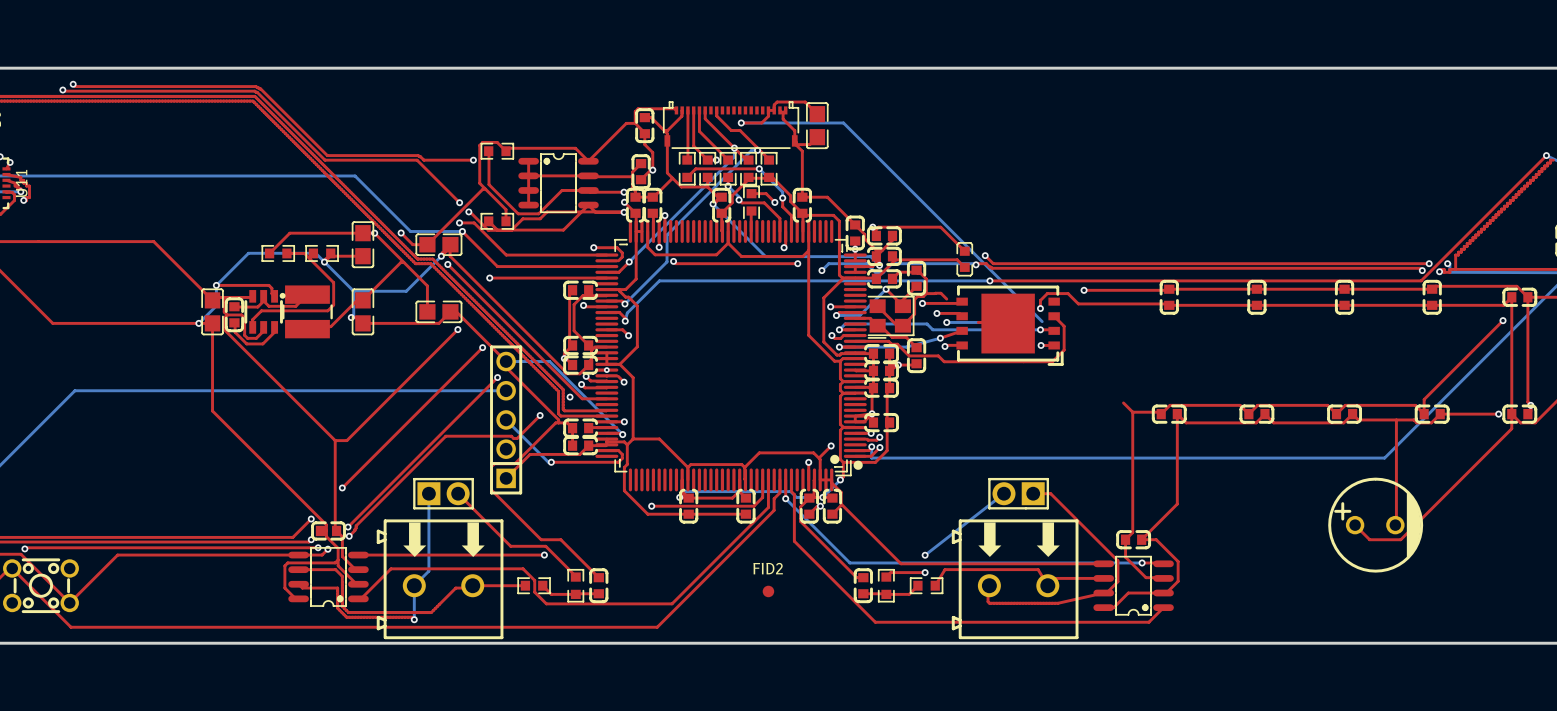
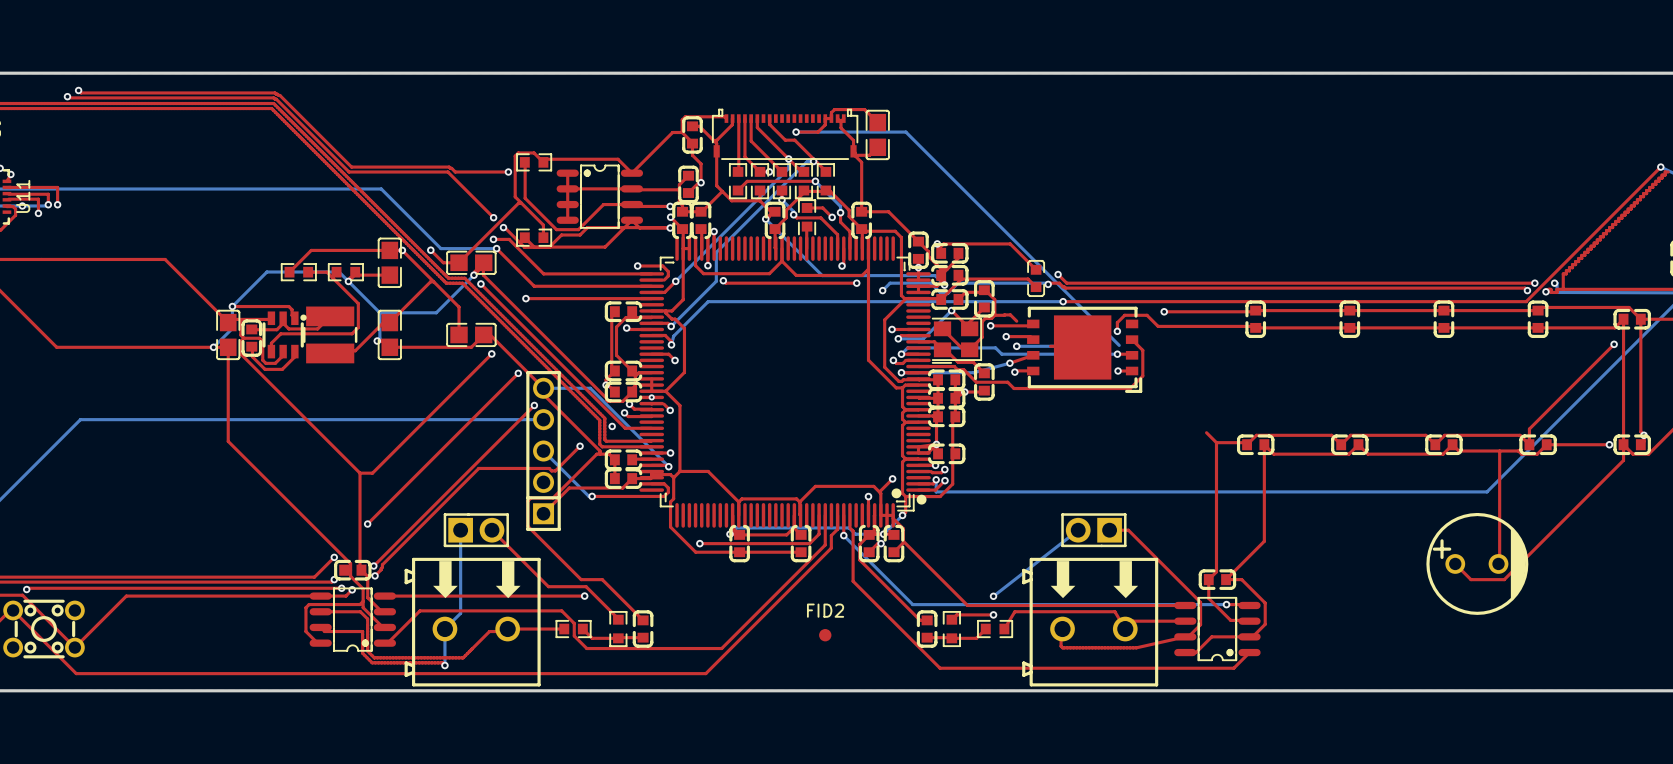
top track: (6, 174) (20, 177) (20, 180) (23, 180) (23, 183) (29, 186) (29, 197) (23, 200) -> none
top track: none -> (8, 187) (57, 187) (57, 204)
top track: (6, 180) (15, 183) (15, 186) (17, 186) (20, 191) -> none
top track: none -> (8, 194) (48, 194) (48, 204)
top track: none -> (8, 199) (38, 199) (38, 213)
bottom track: none -> (48, 204) (22, 205)
via: none -> (48, 204)
via: none -> (57, 204)
via: none -> (38, 213)
via: (23, 200) -> none

